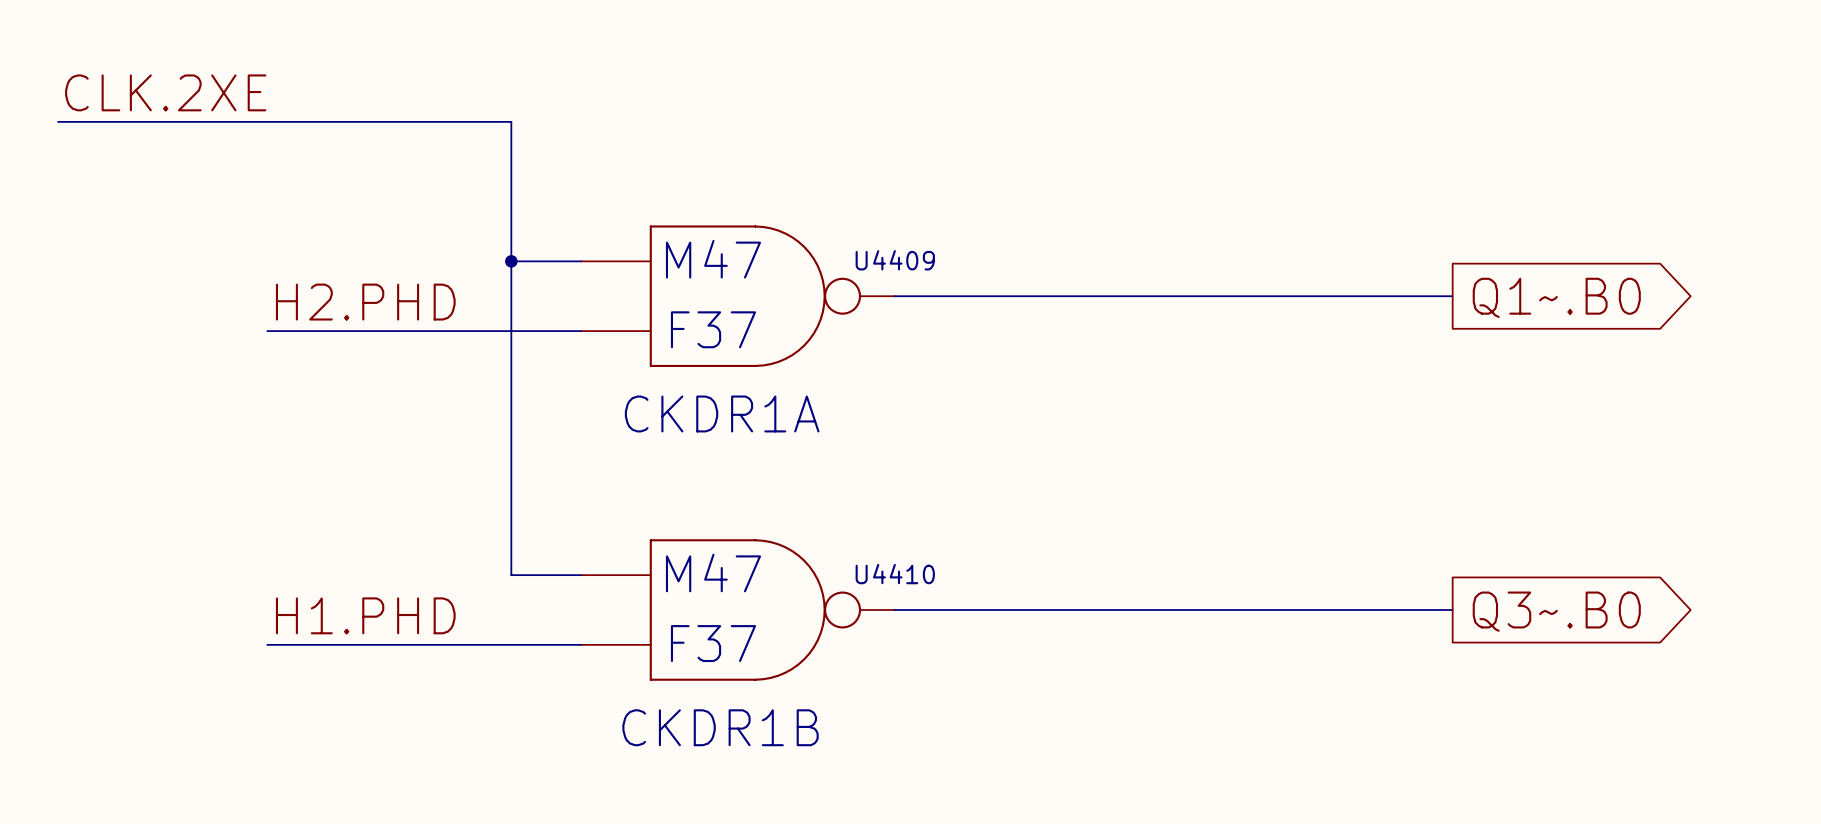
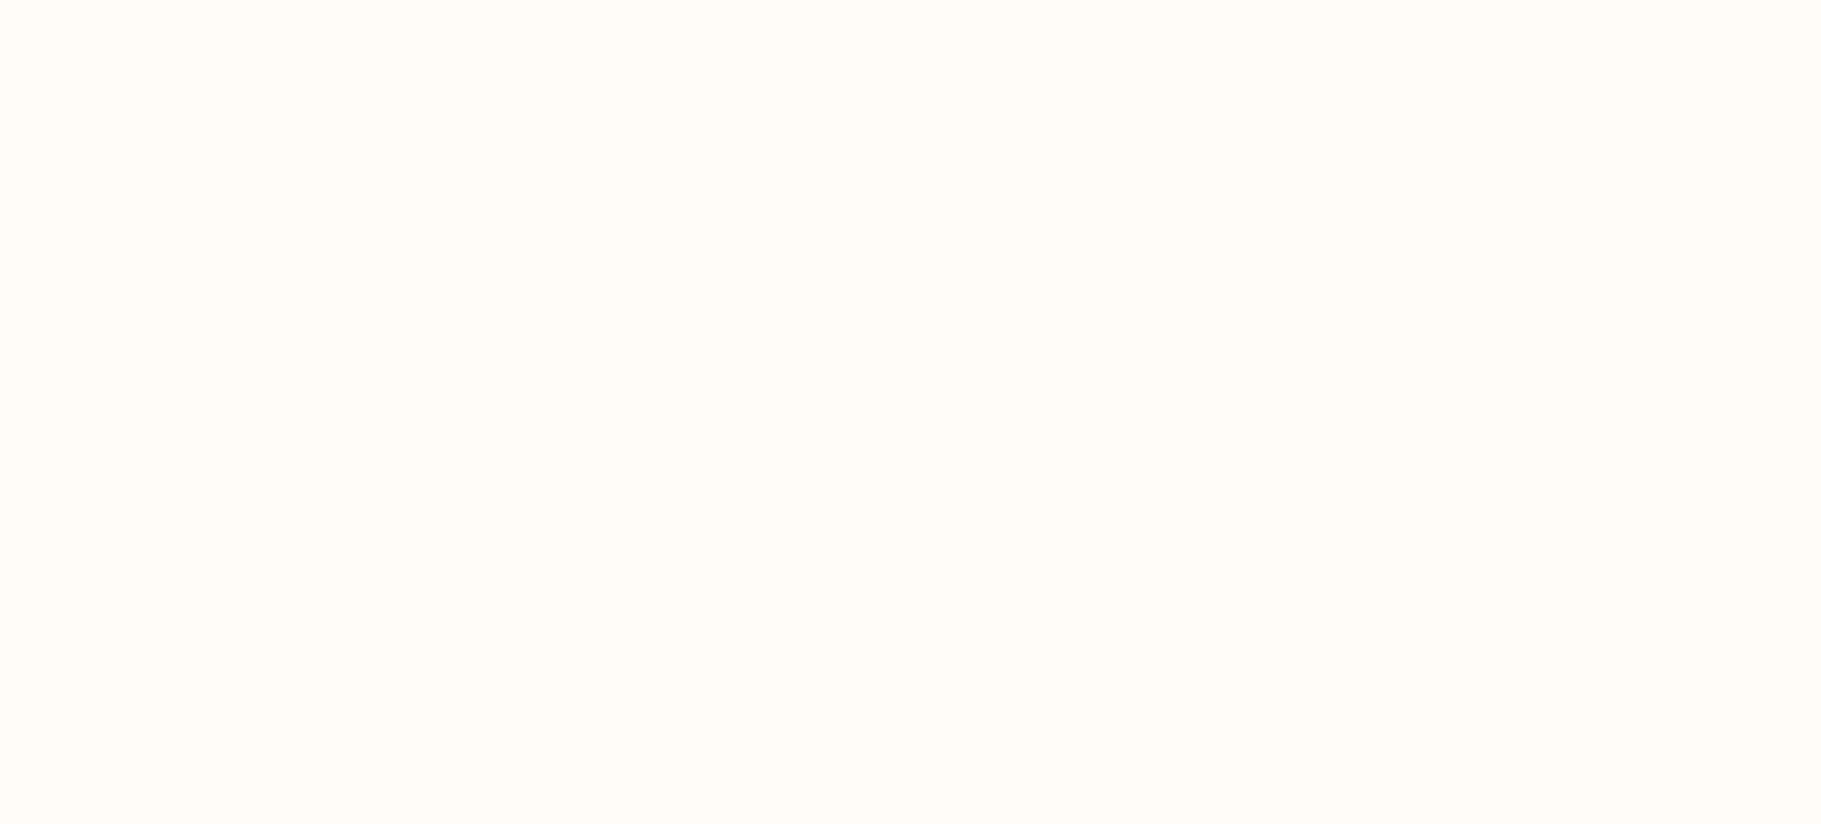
label: CLK.2XE (165, 92) -> none
wire: (58, 121) (511, 121) (511, 575) (581, 575) -> none
wire: (511, 261) (581, 261) -> none
junction: (511, 261) -> none
U4409: F37 (737, 296) -> none
wire: (894, 296) (1452, 296) -> none
global label: Q1~.B0 (1556, 297) -> none
label: H2.PHD (365, 302) -> none
wire: (267, 331) (581, 331) -> none
U4410: F37 (737, 610) -> none
wire: (894, 610) (1452, 610) -> none
global label: Q3~.B0 (1556, 611) -> none
label: H1.PHD (365, 615) -> none
wire: (267, 644) (581, 644) -> none

